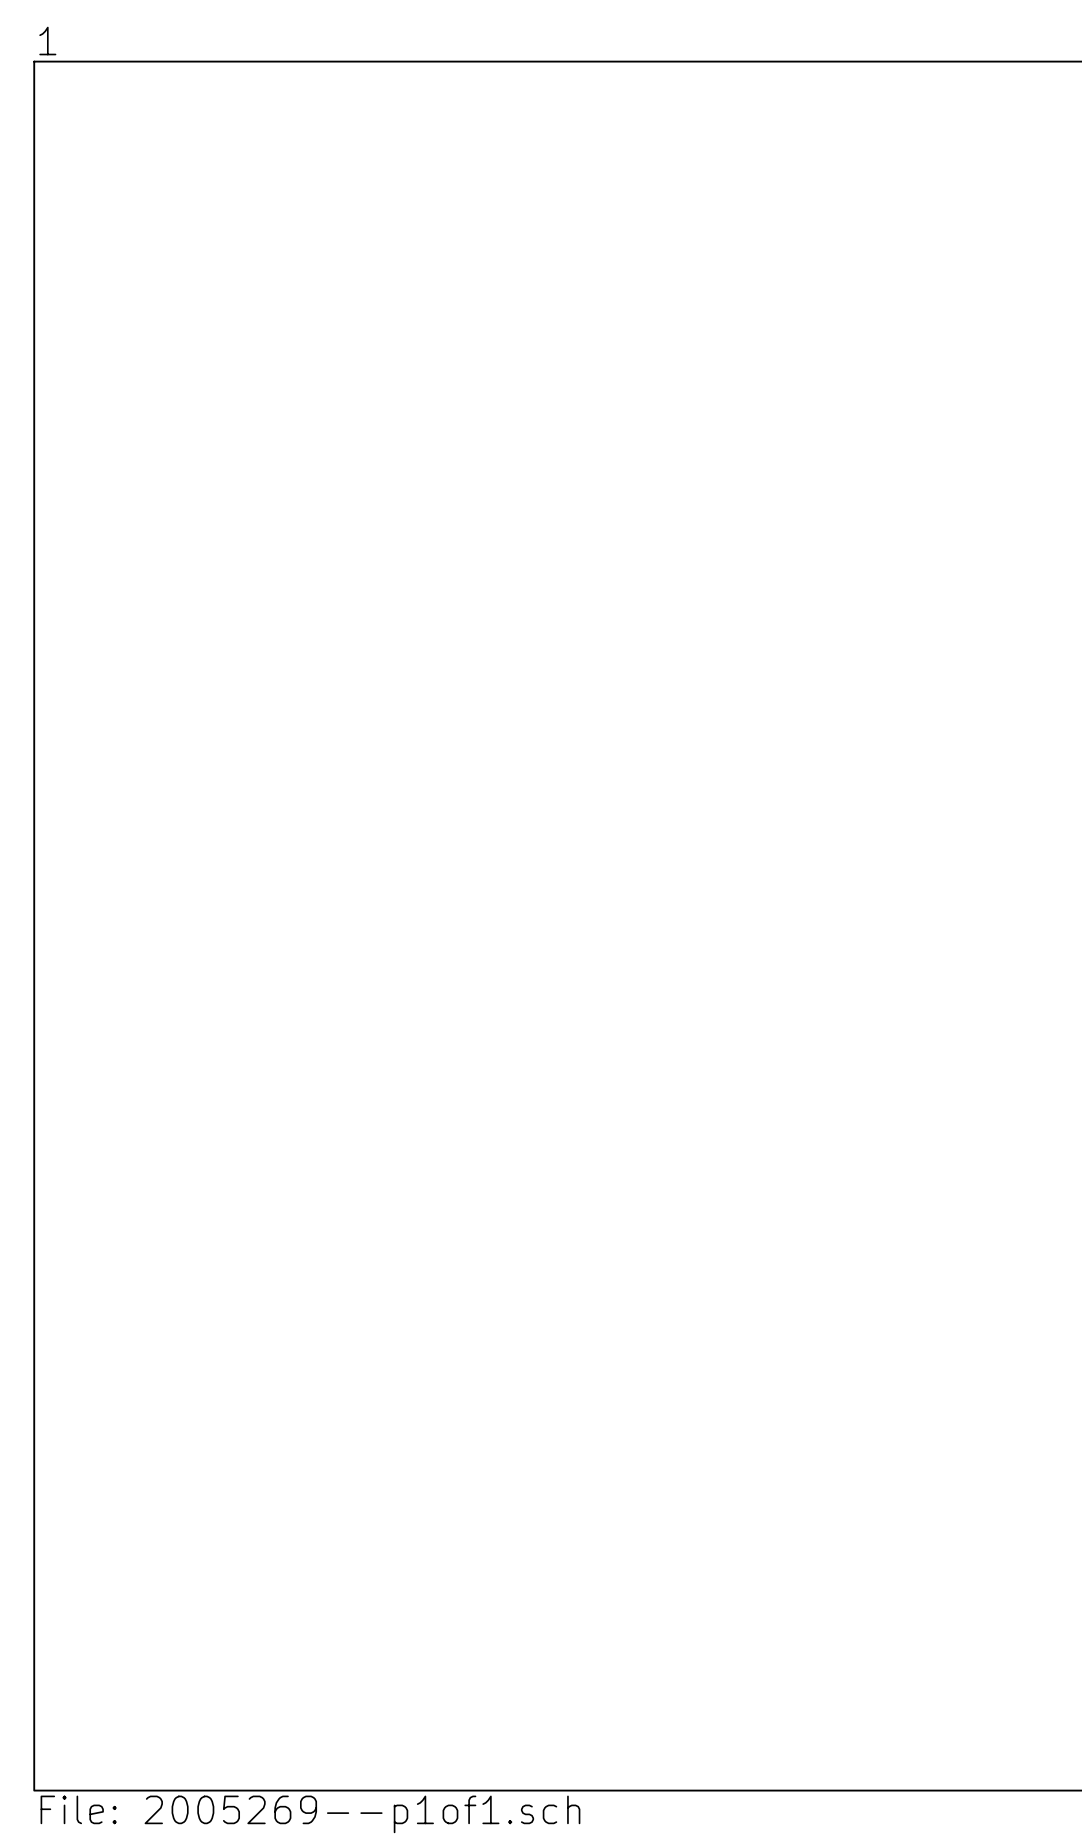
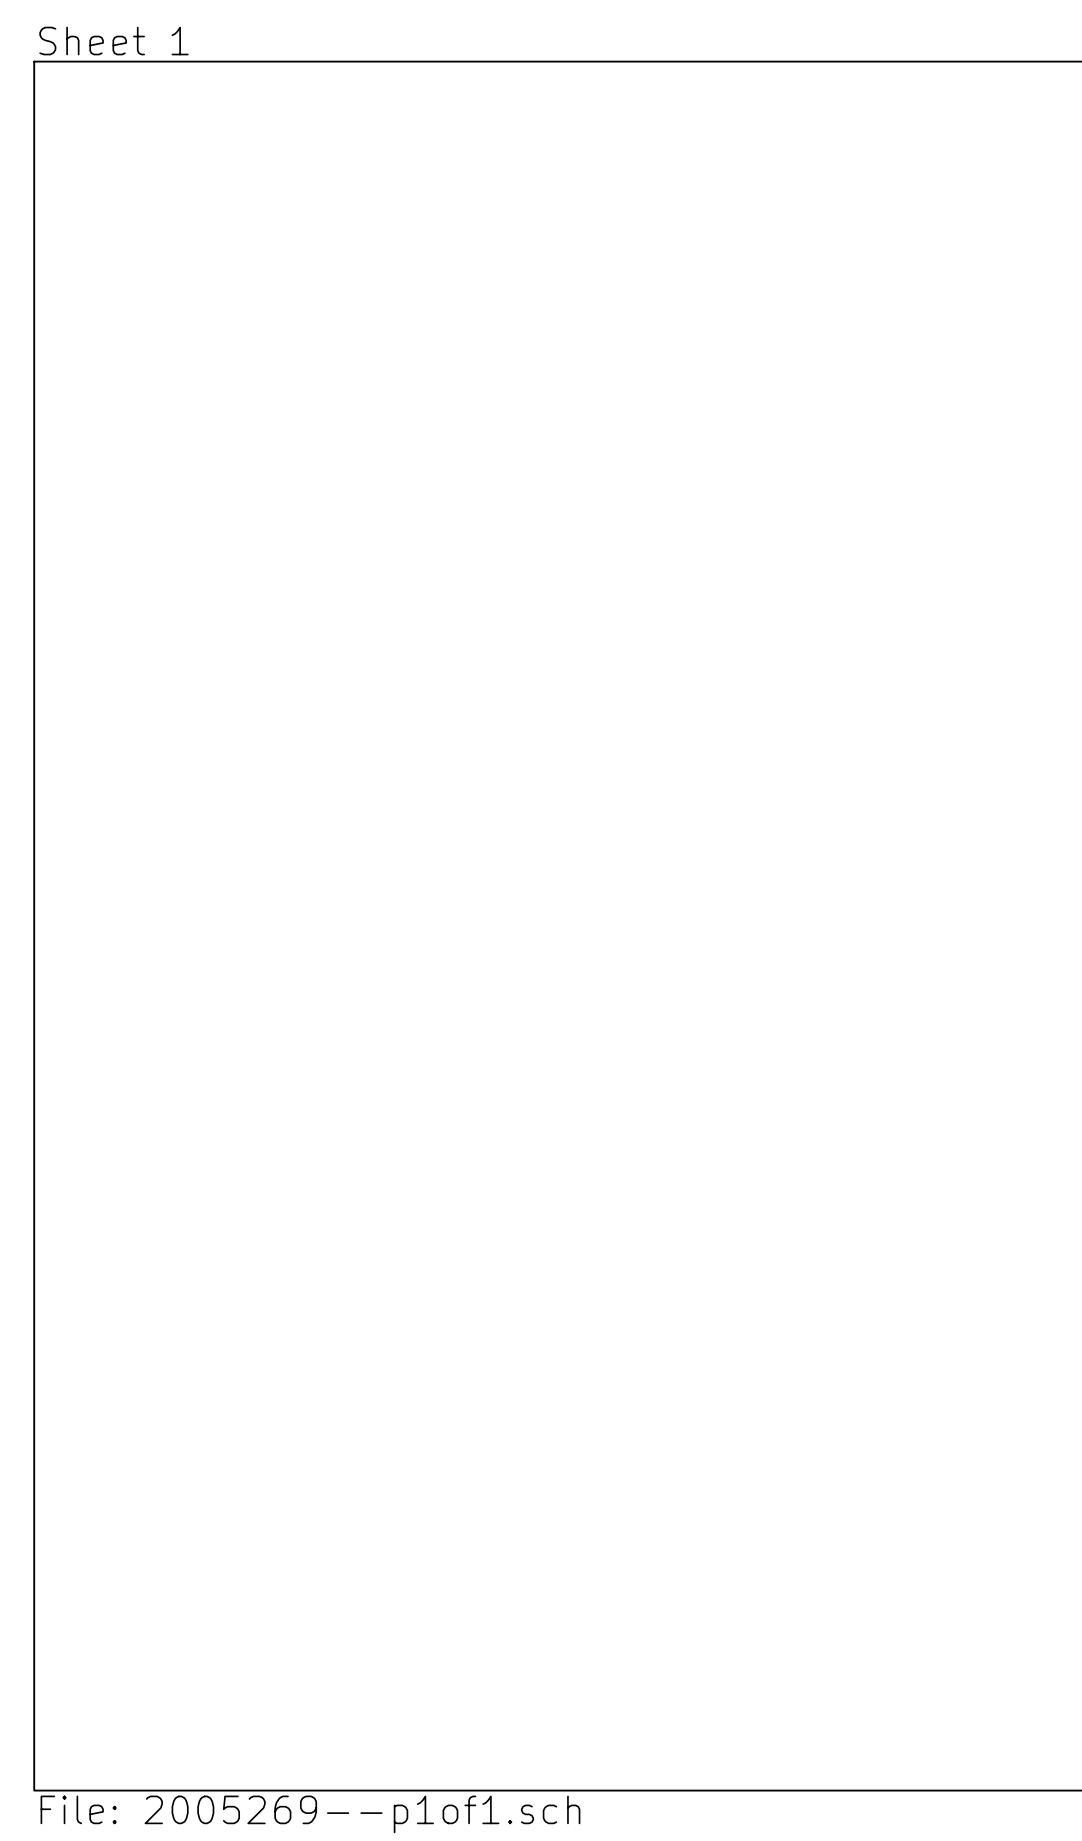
sheet 1 name: 1 (47, 41) -> Sheet 1 (113, 41)

